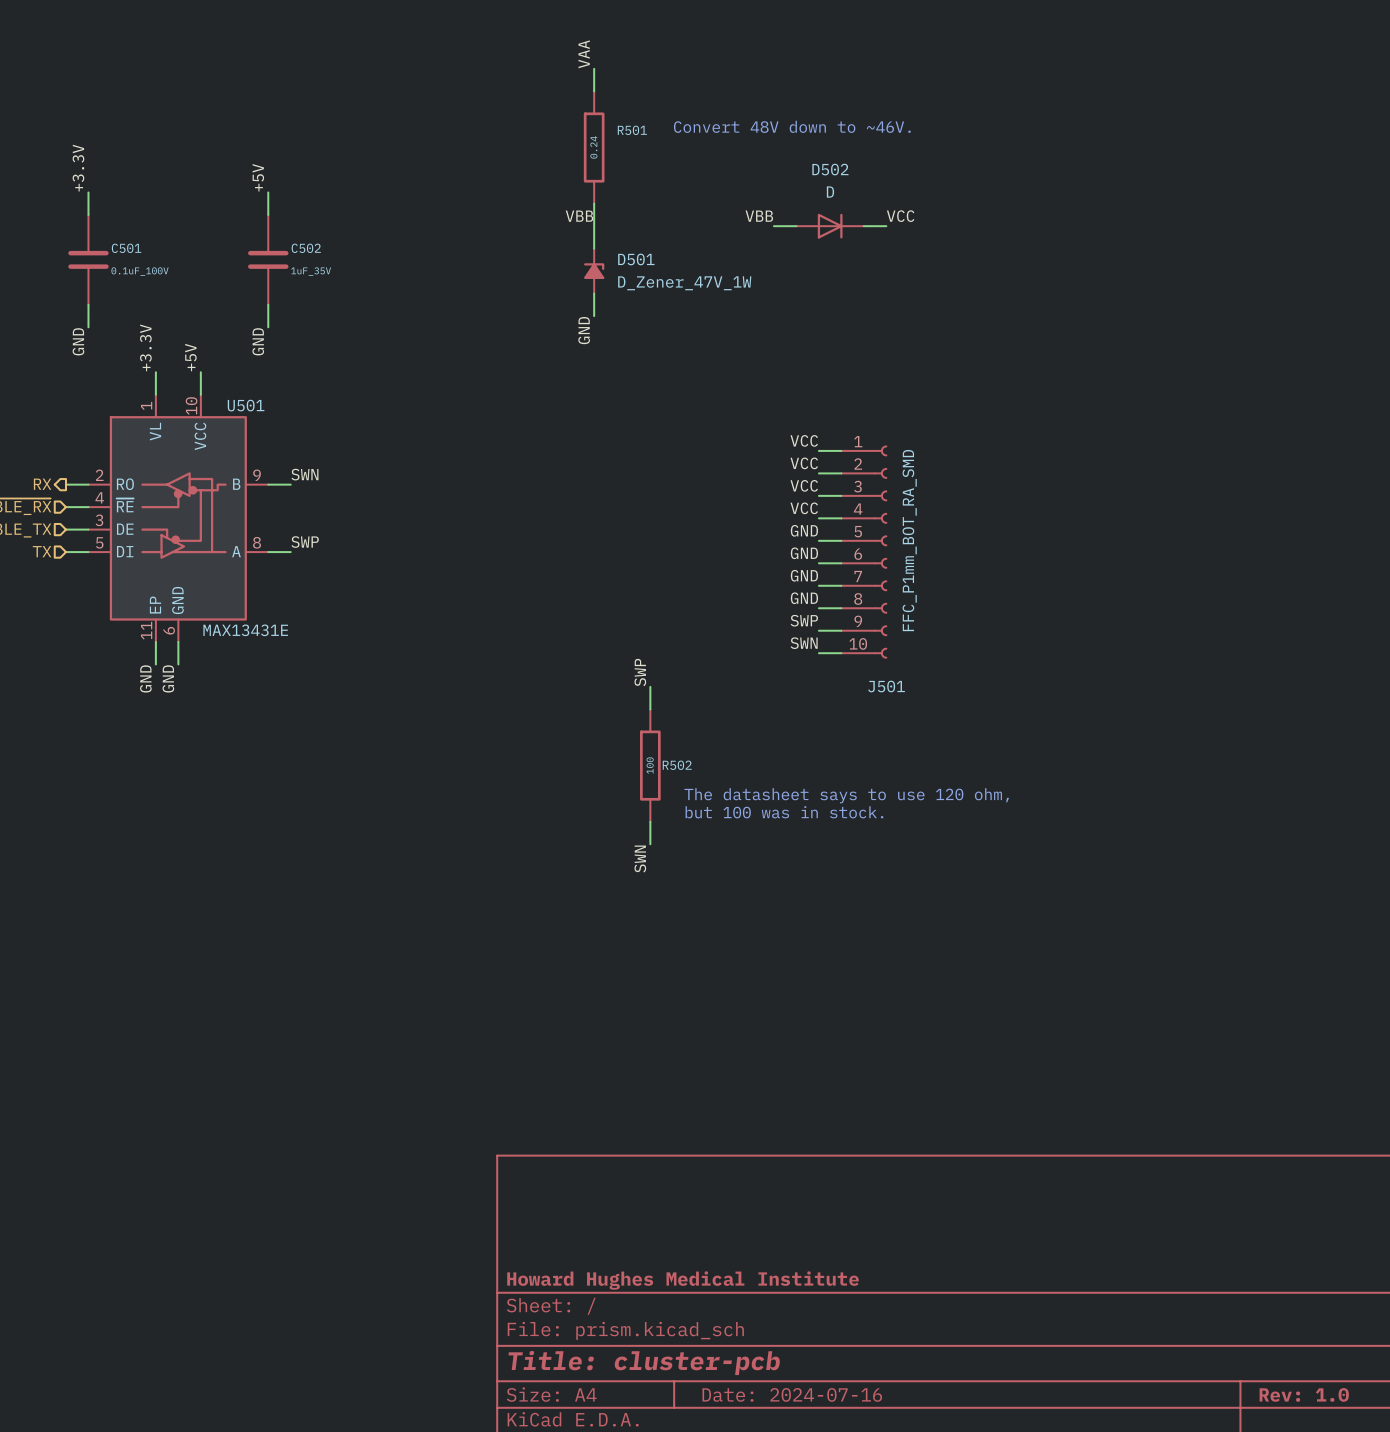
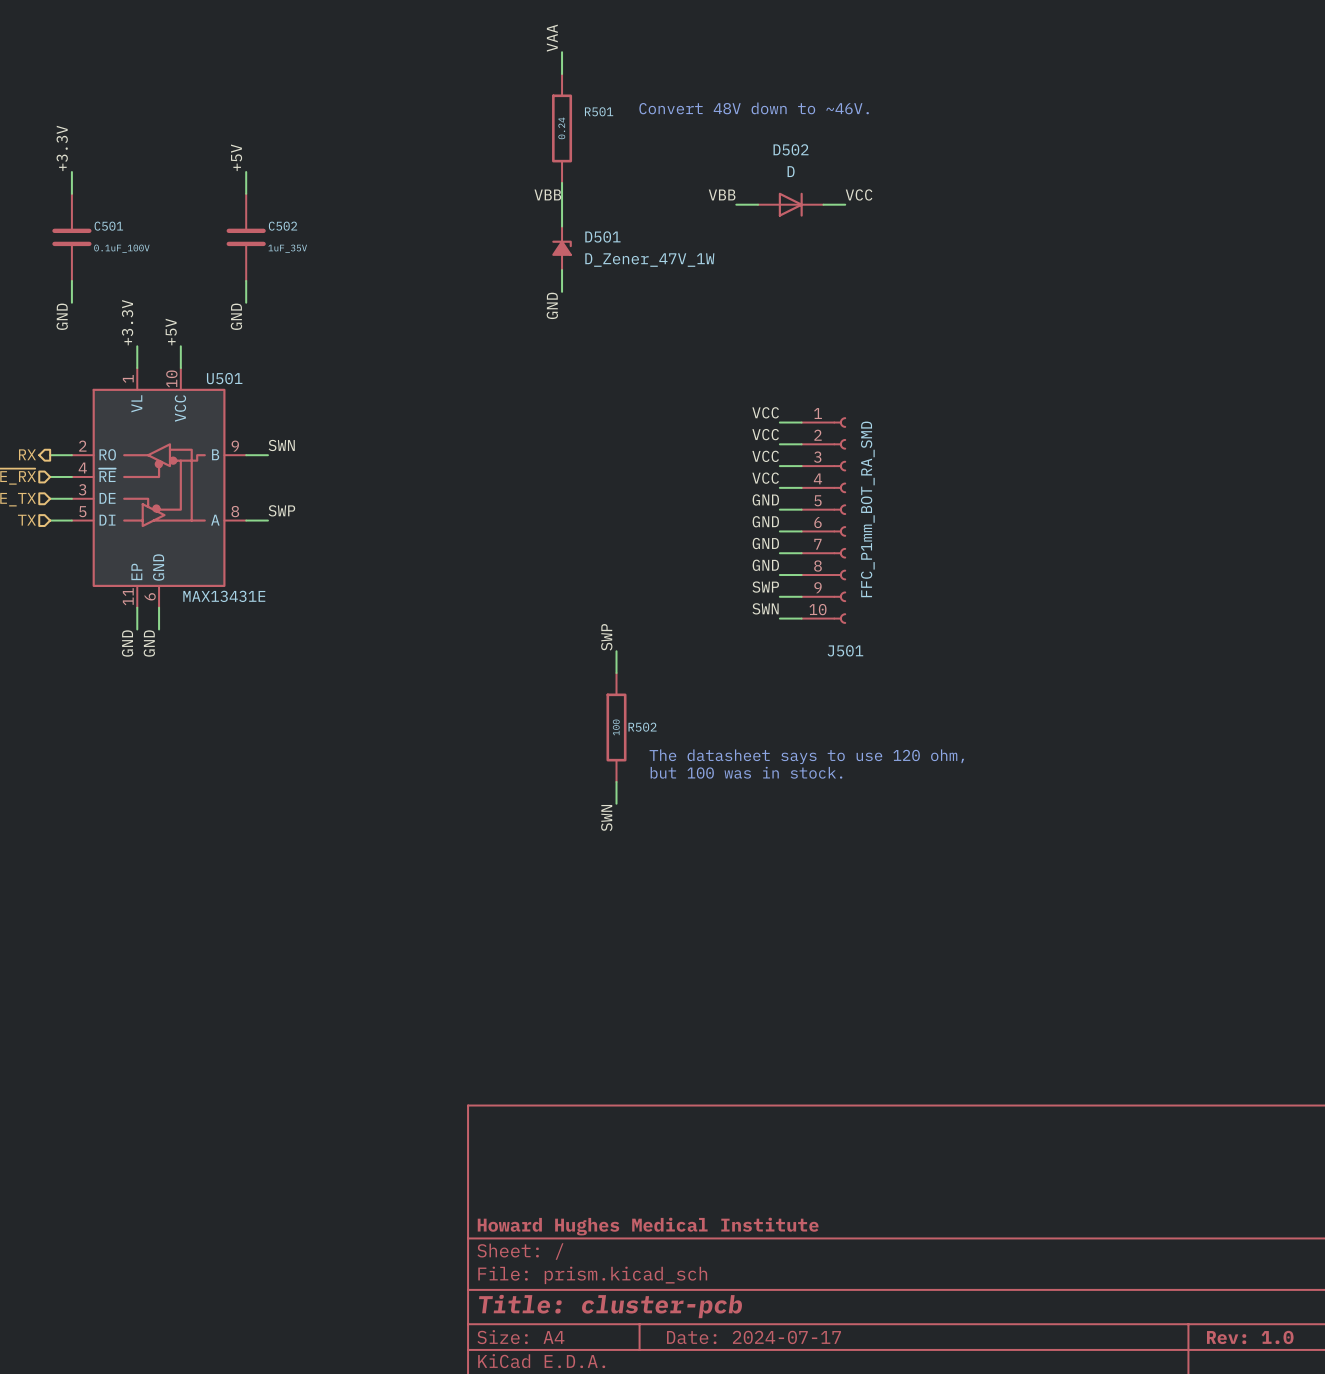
title block: Date: 2024-07-16 (792, 1394) -> Date: 2024-07-17 (754, 1337)

